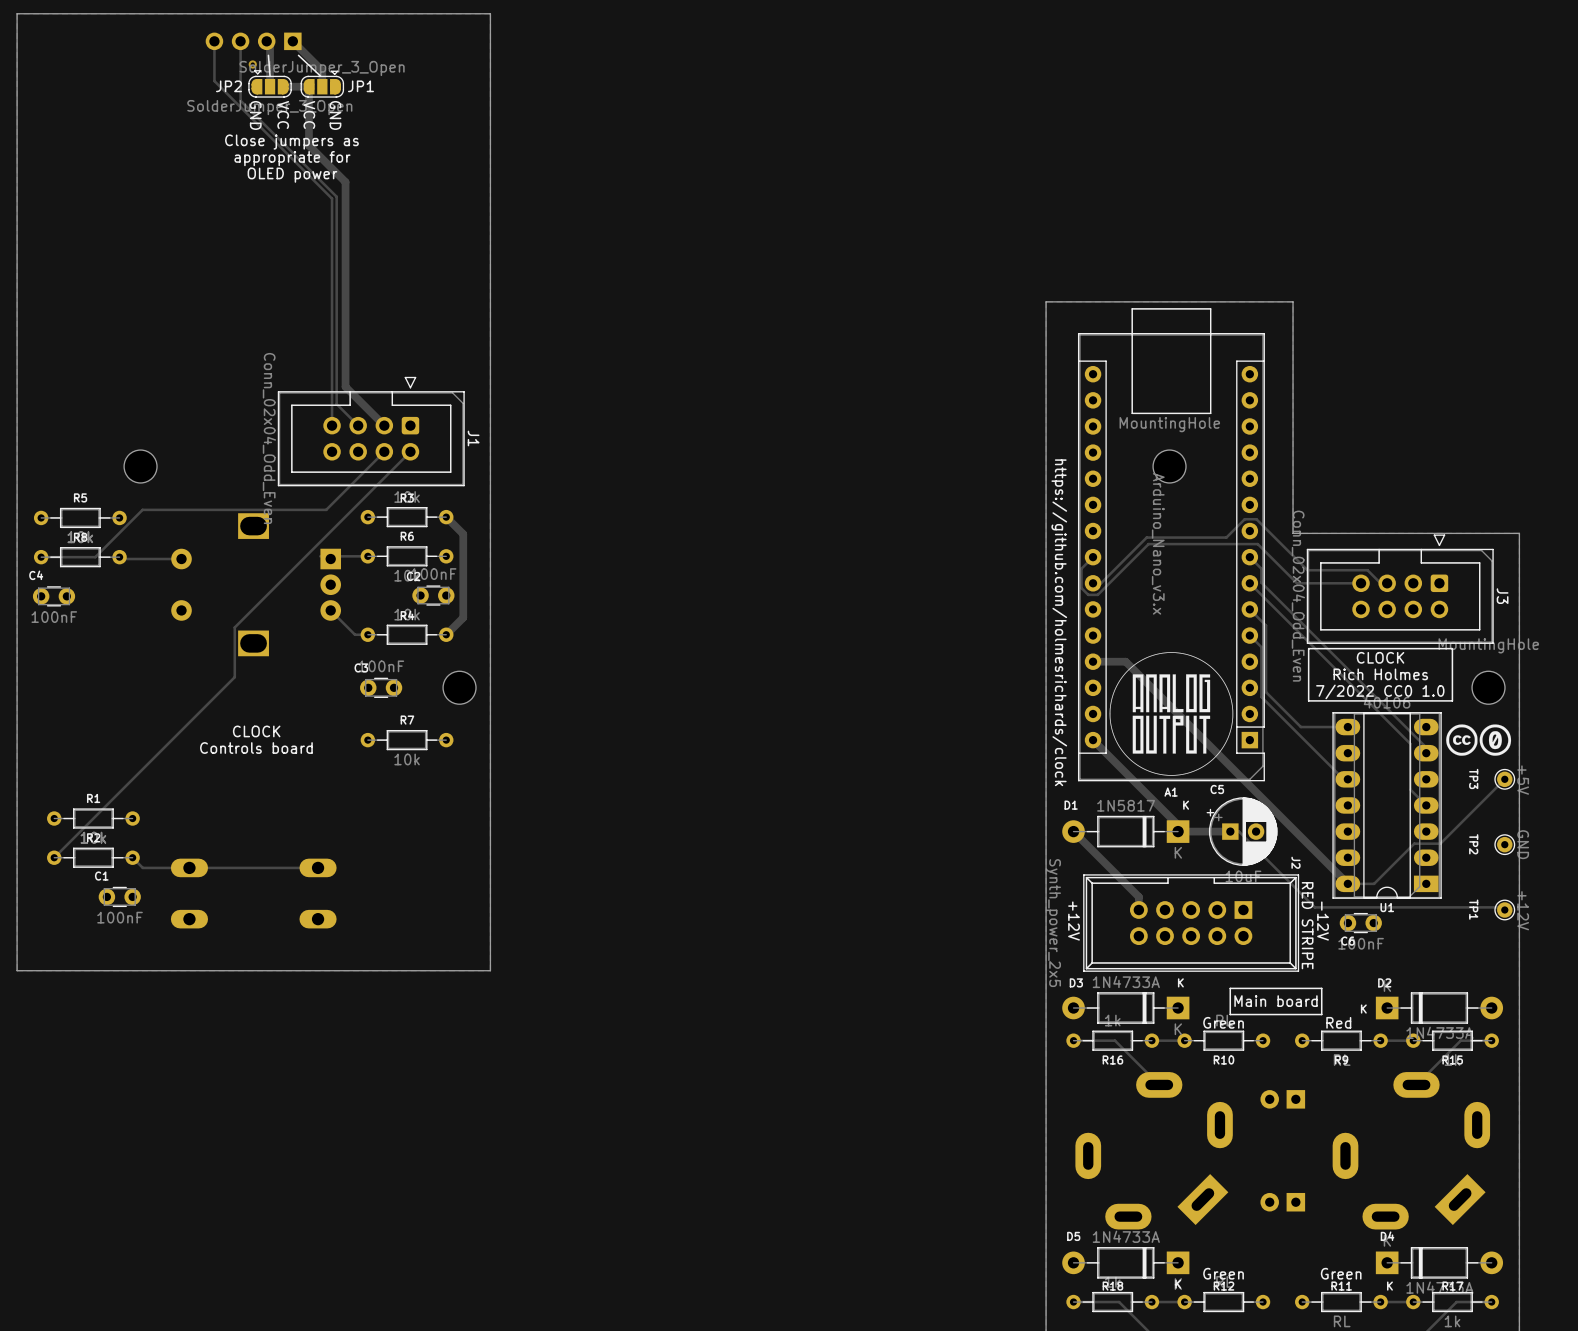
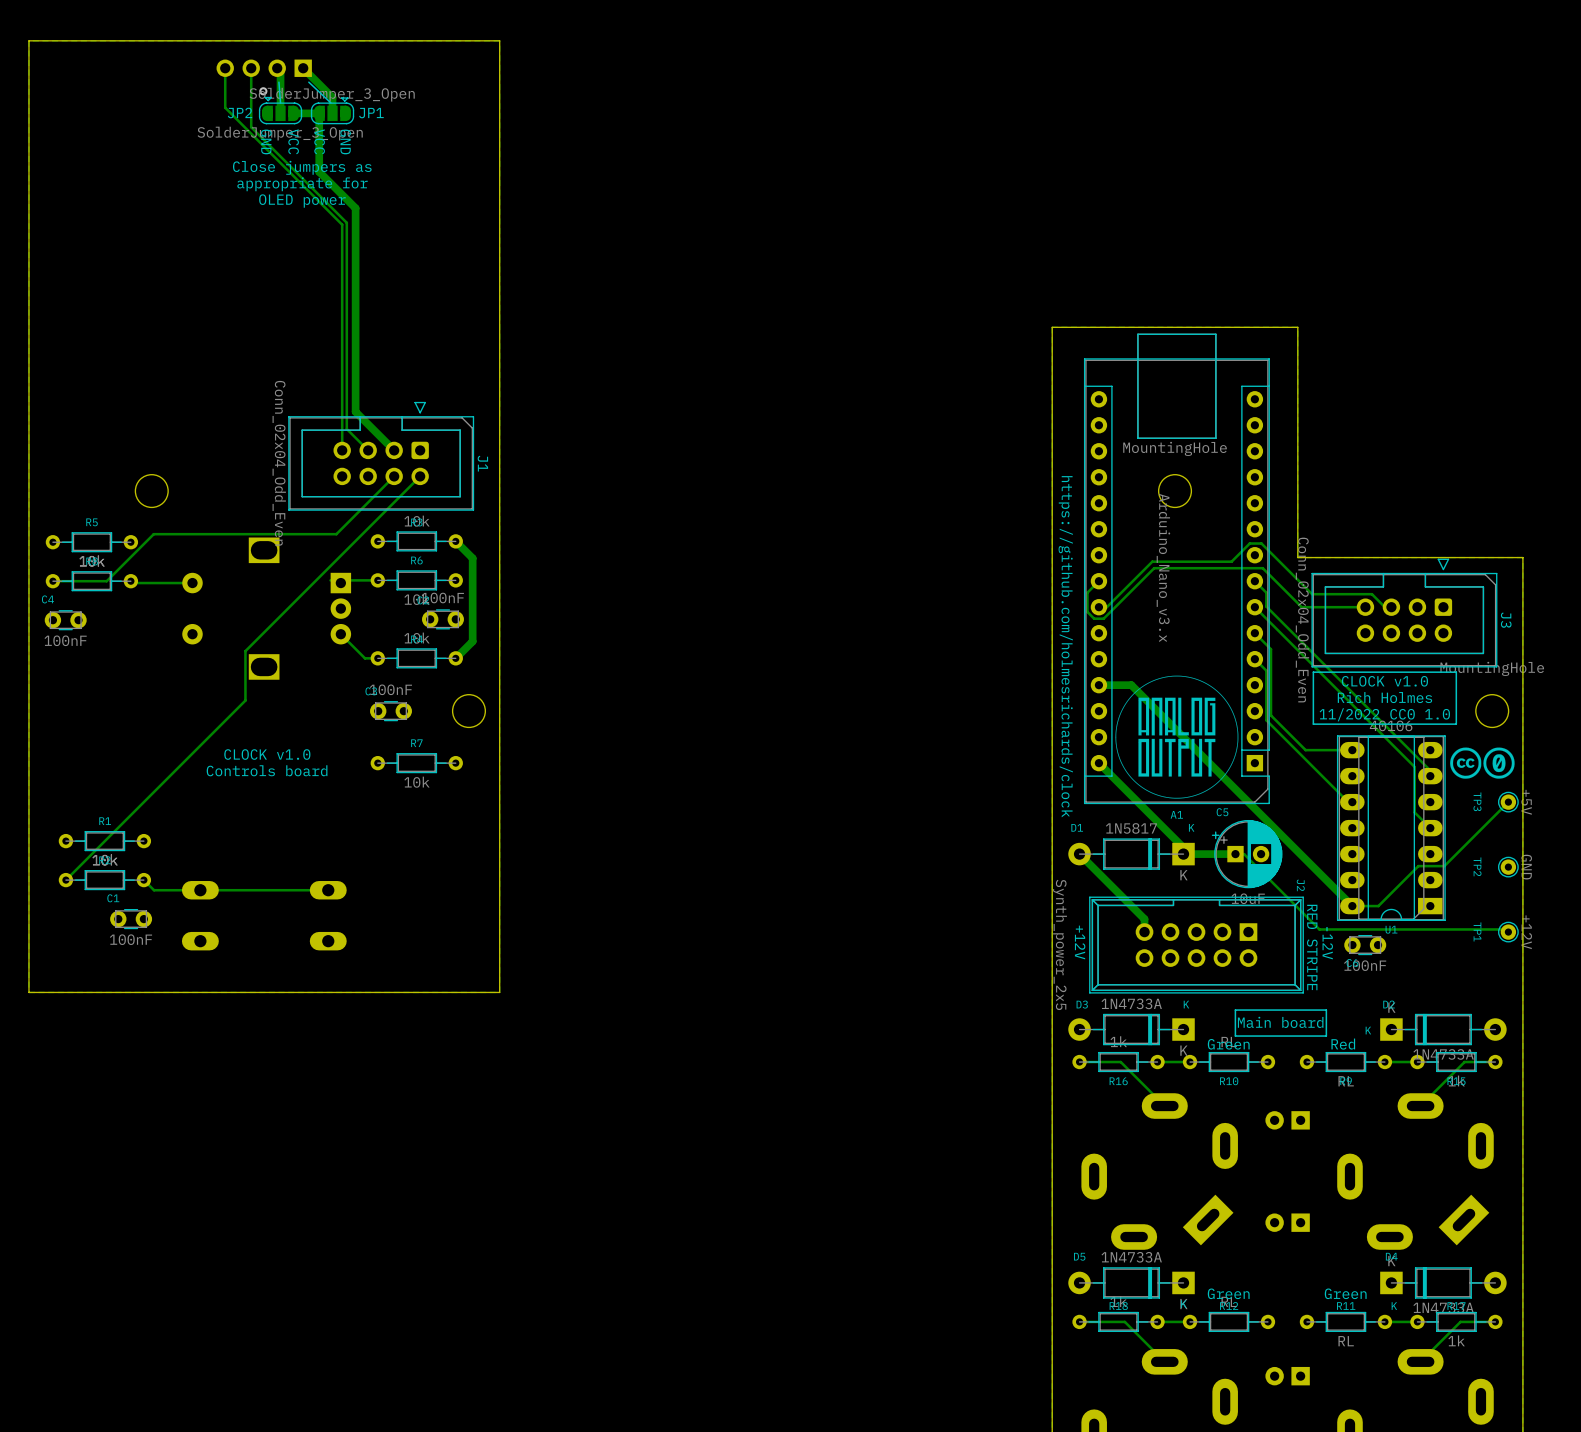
text: CLOCK (1380, 657) -> CLOCK v1.0 (1384, 681)
text: 7/2022 CC0 1.0 (1380, 691) -> 11/2022 CC0 1.0 (1384, 714)
text: CLOCK (256, 731) -> CLOCK v1.0 (267, 754)

